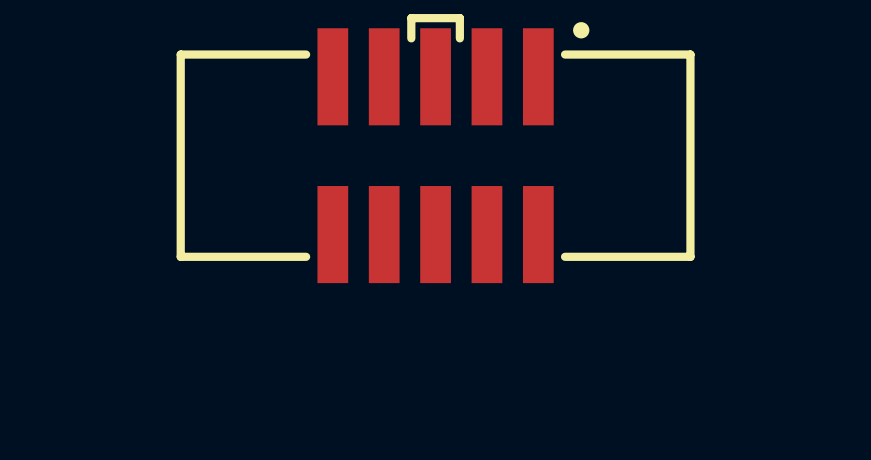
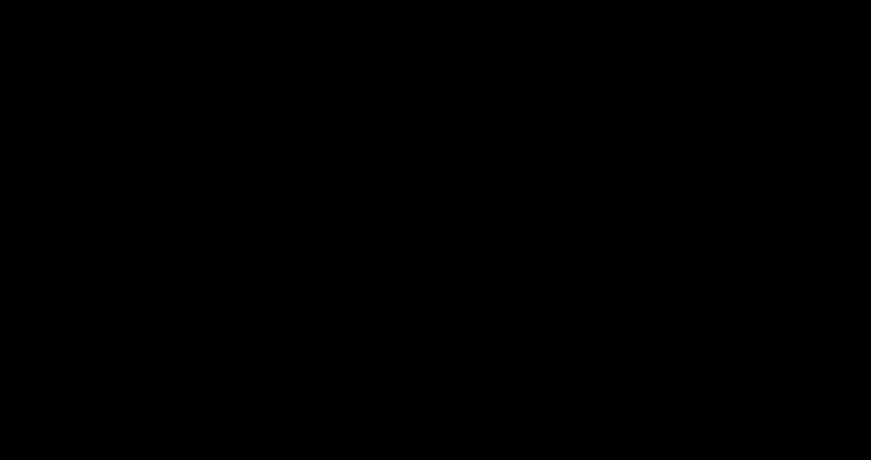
part: (435, 148) -> none

